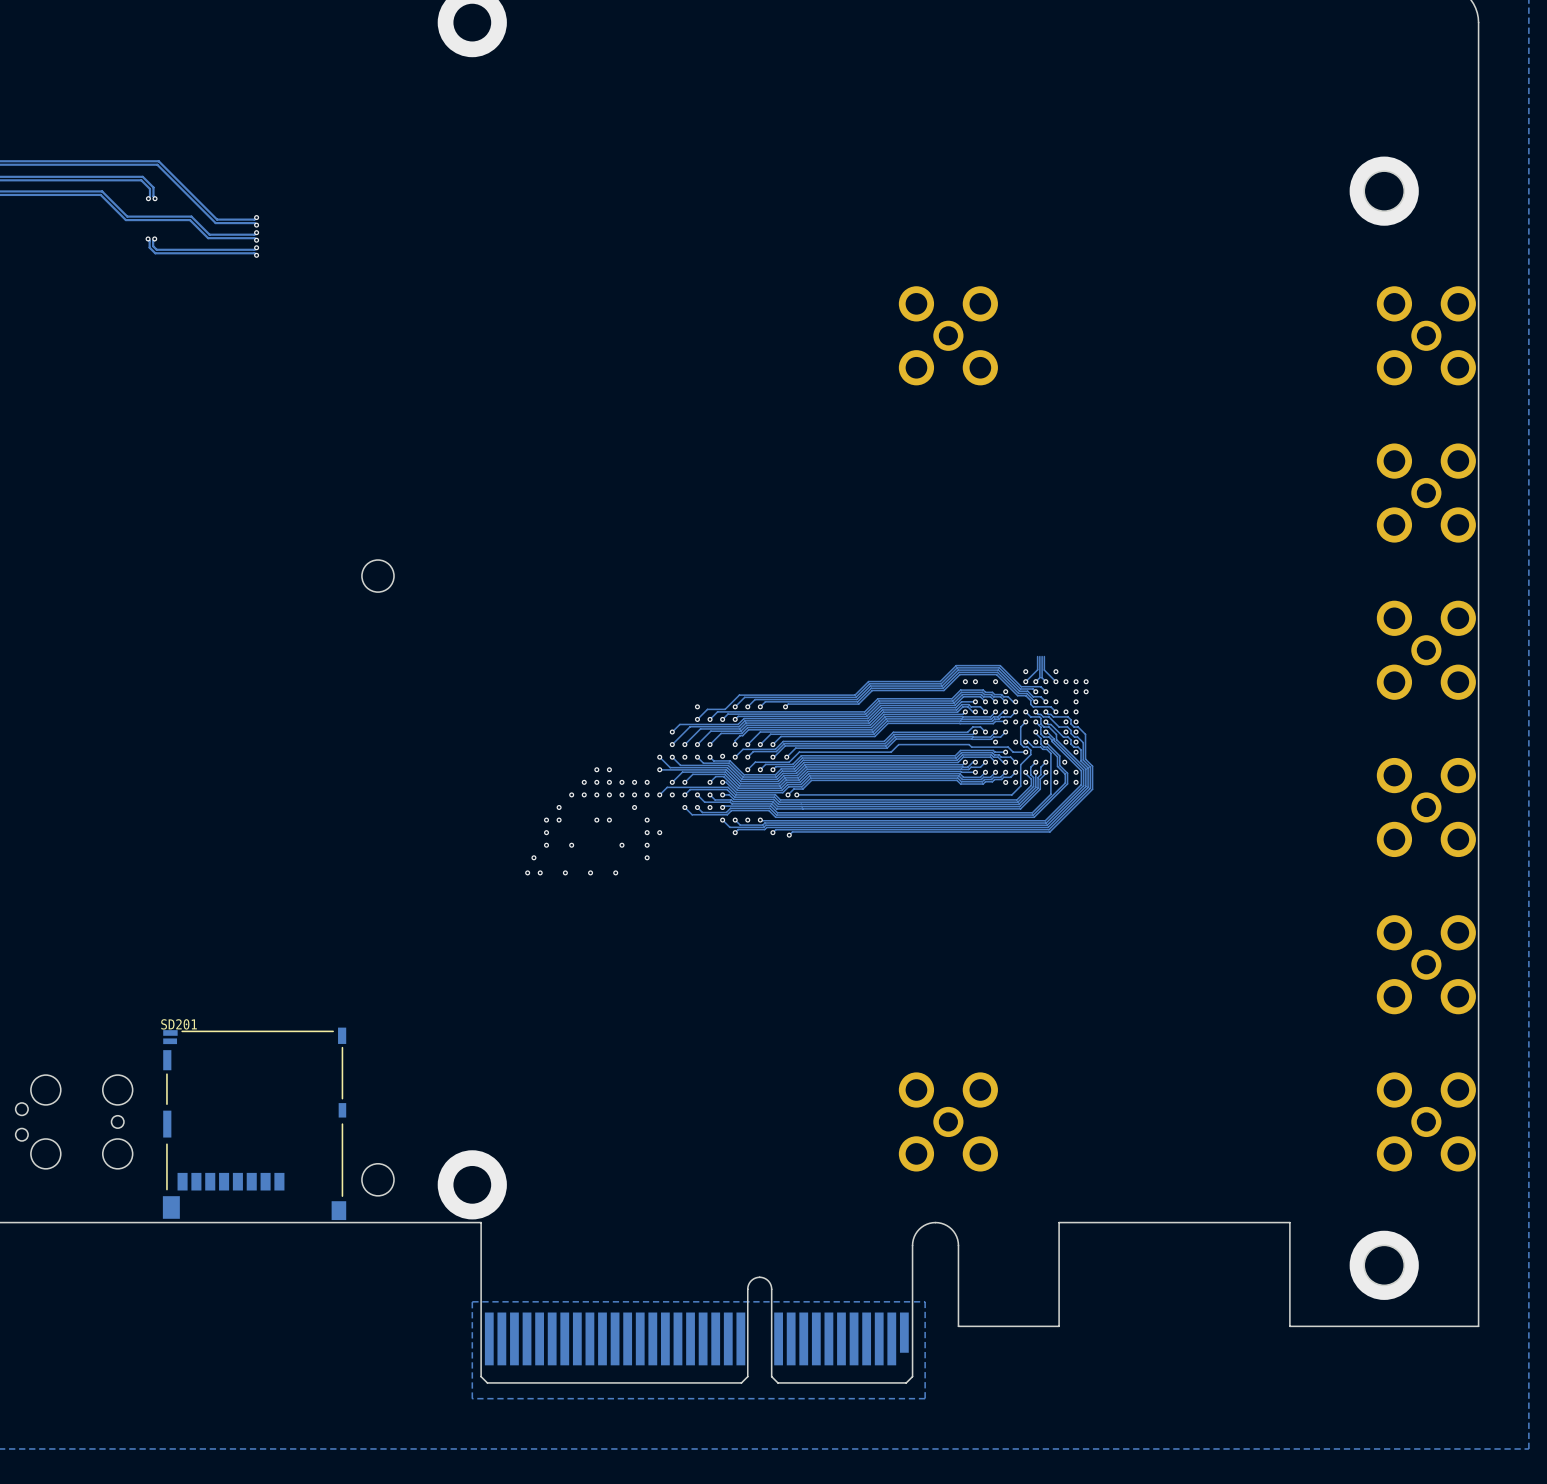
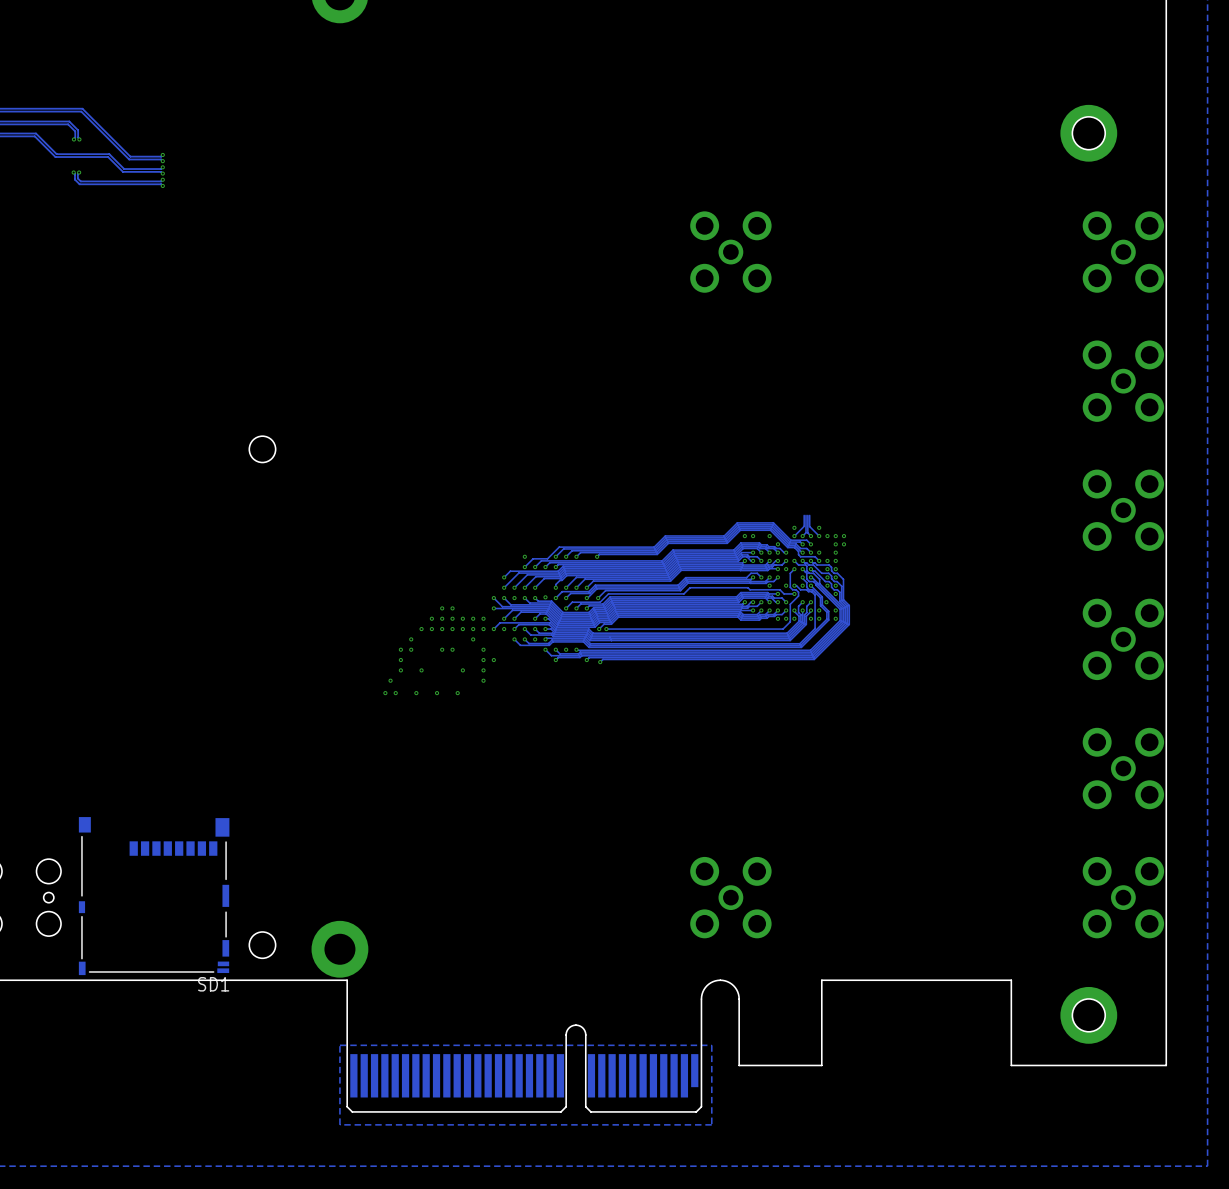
SD1: none -> (154, 896)
SD201: (254, 1123) -> none

